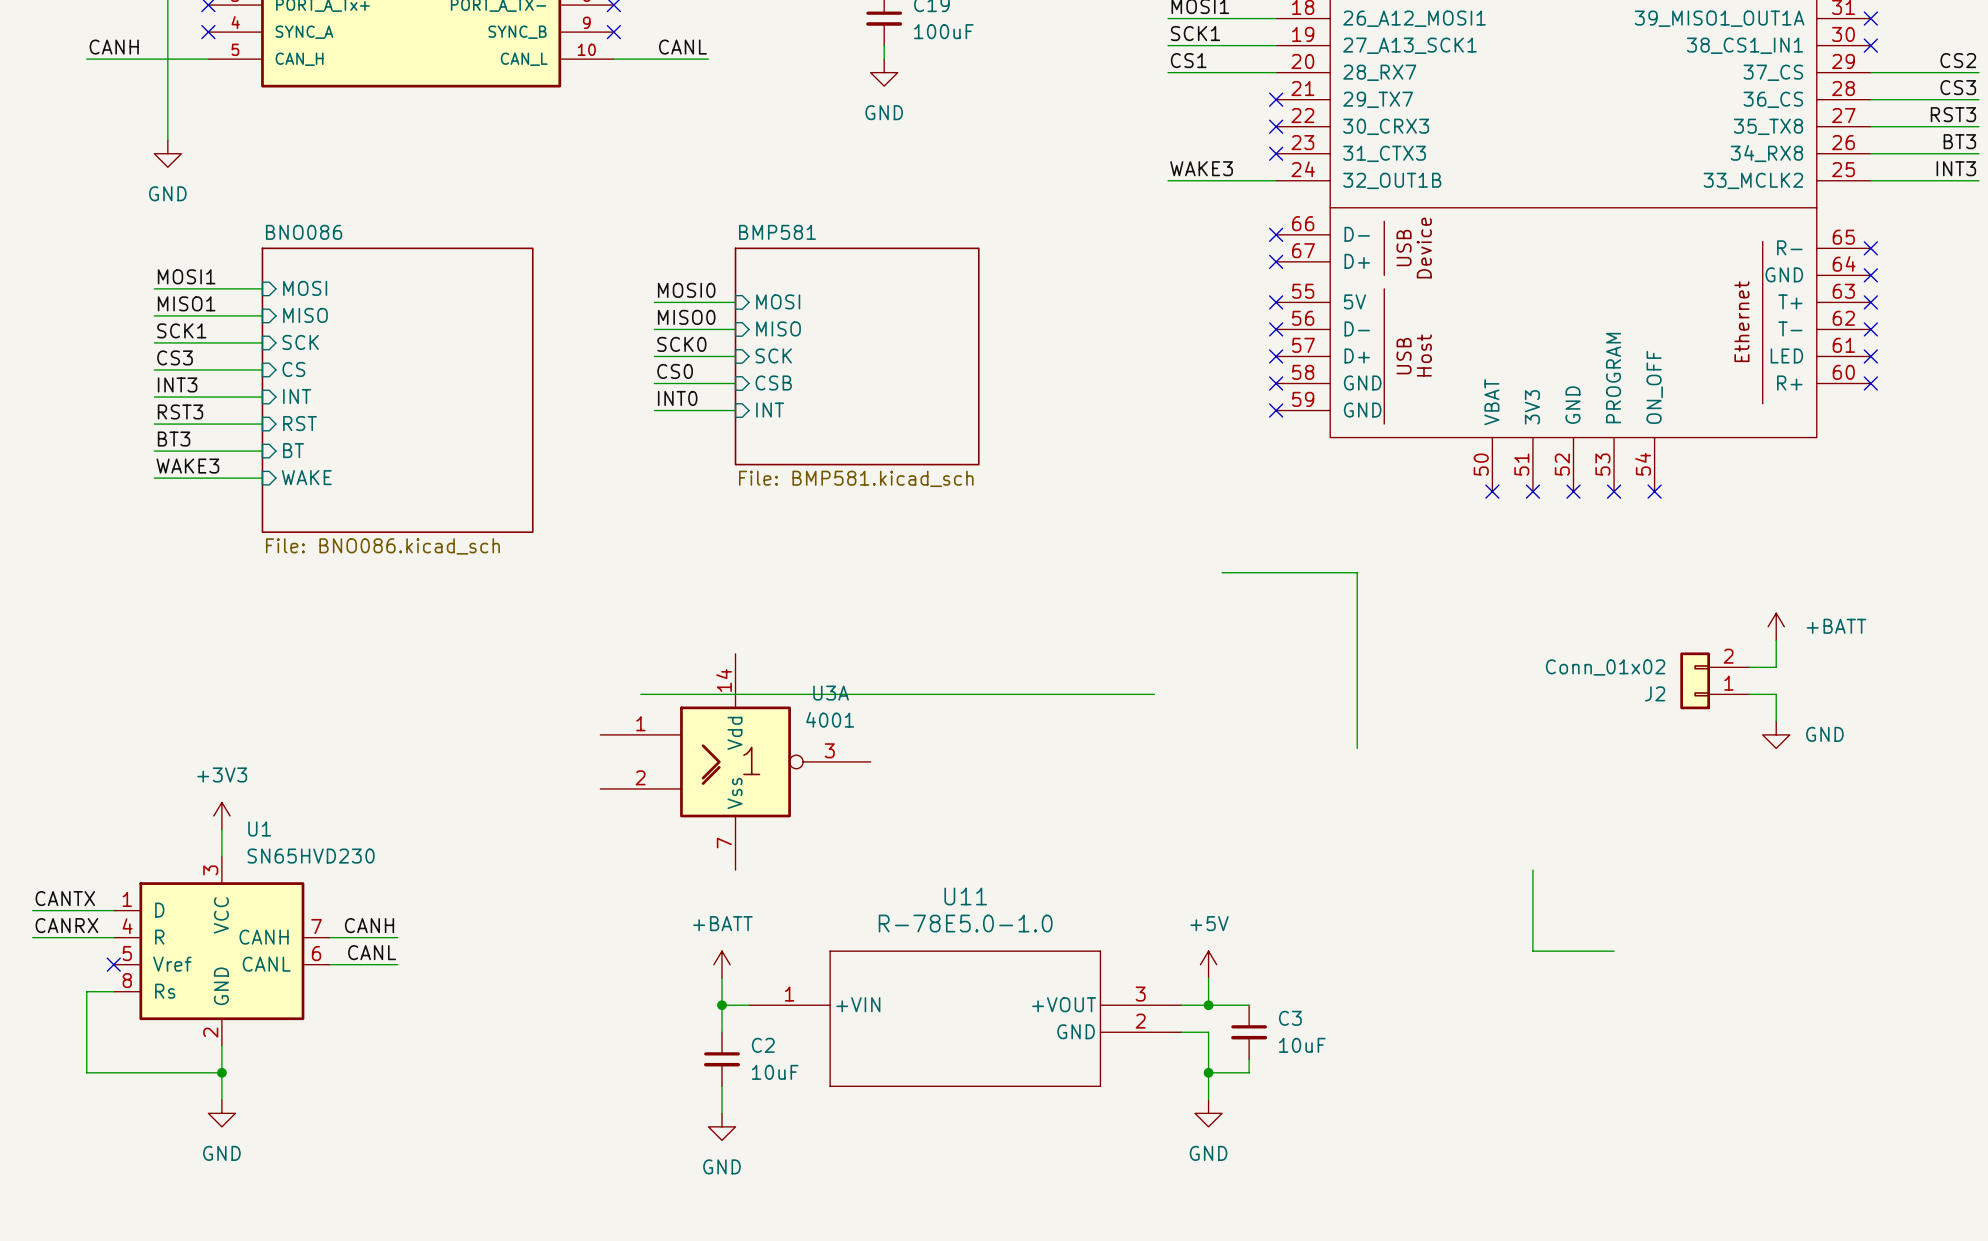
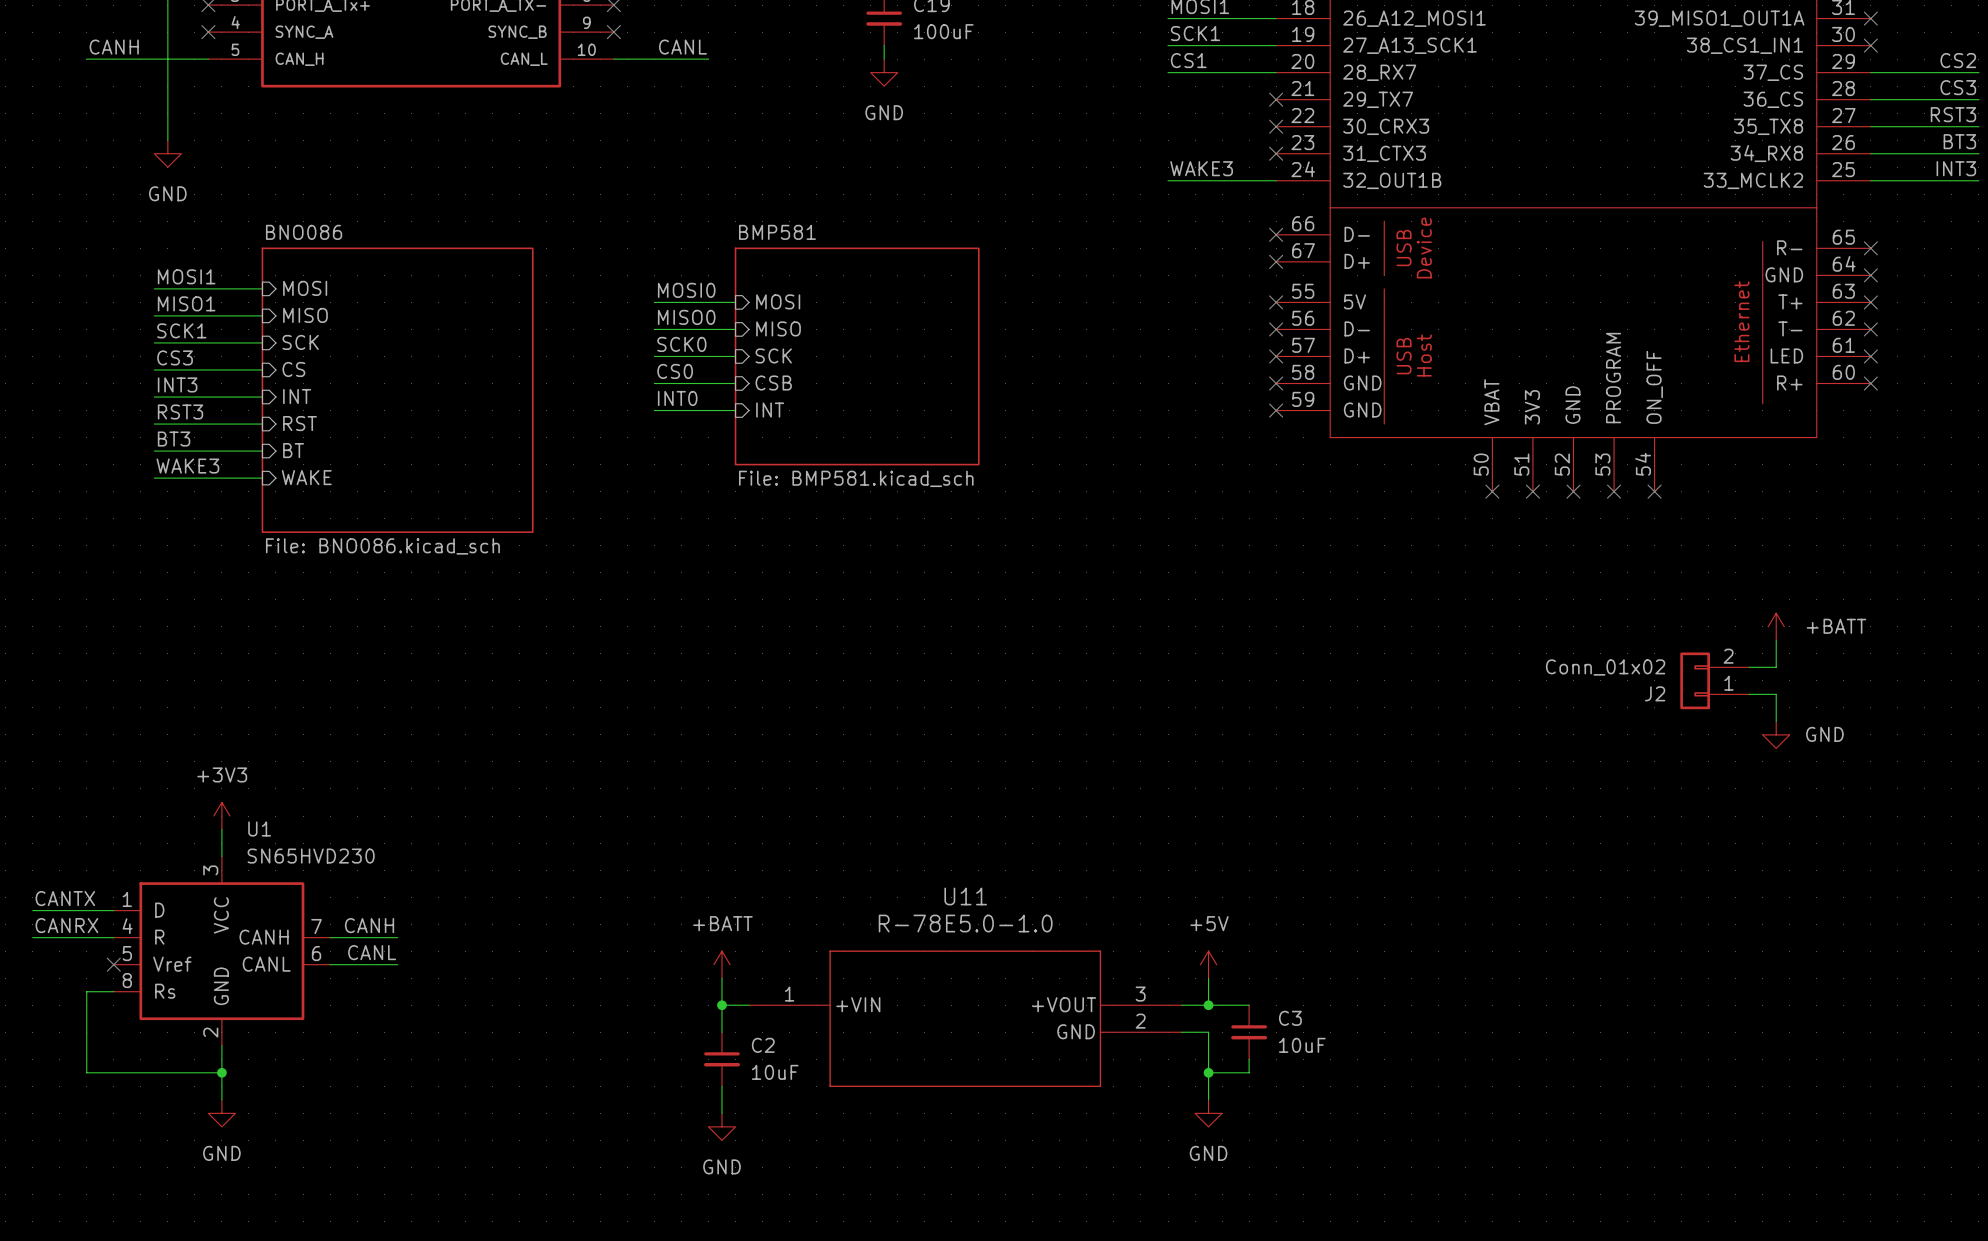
wire: (1222, 572) (1357, 572) (1357, 748) -> none
wire: (640, 694) (1154, 694) -> none
U3A: 4001 (735, 761) -> none
wire: (1532, 870) (1532, 951) (1614, 951) -> none

